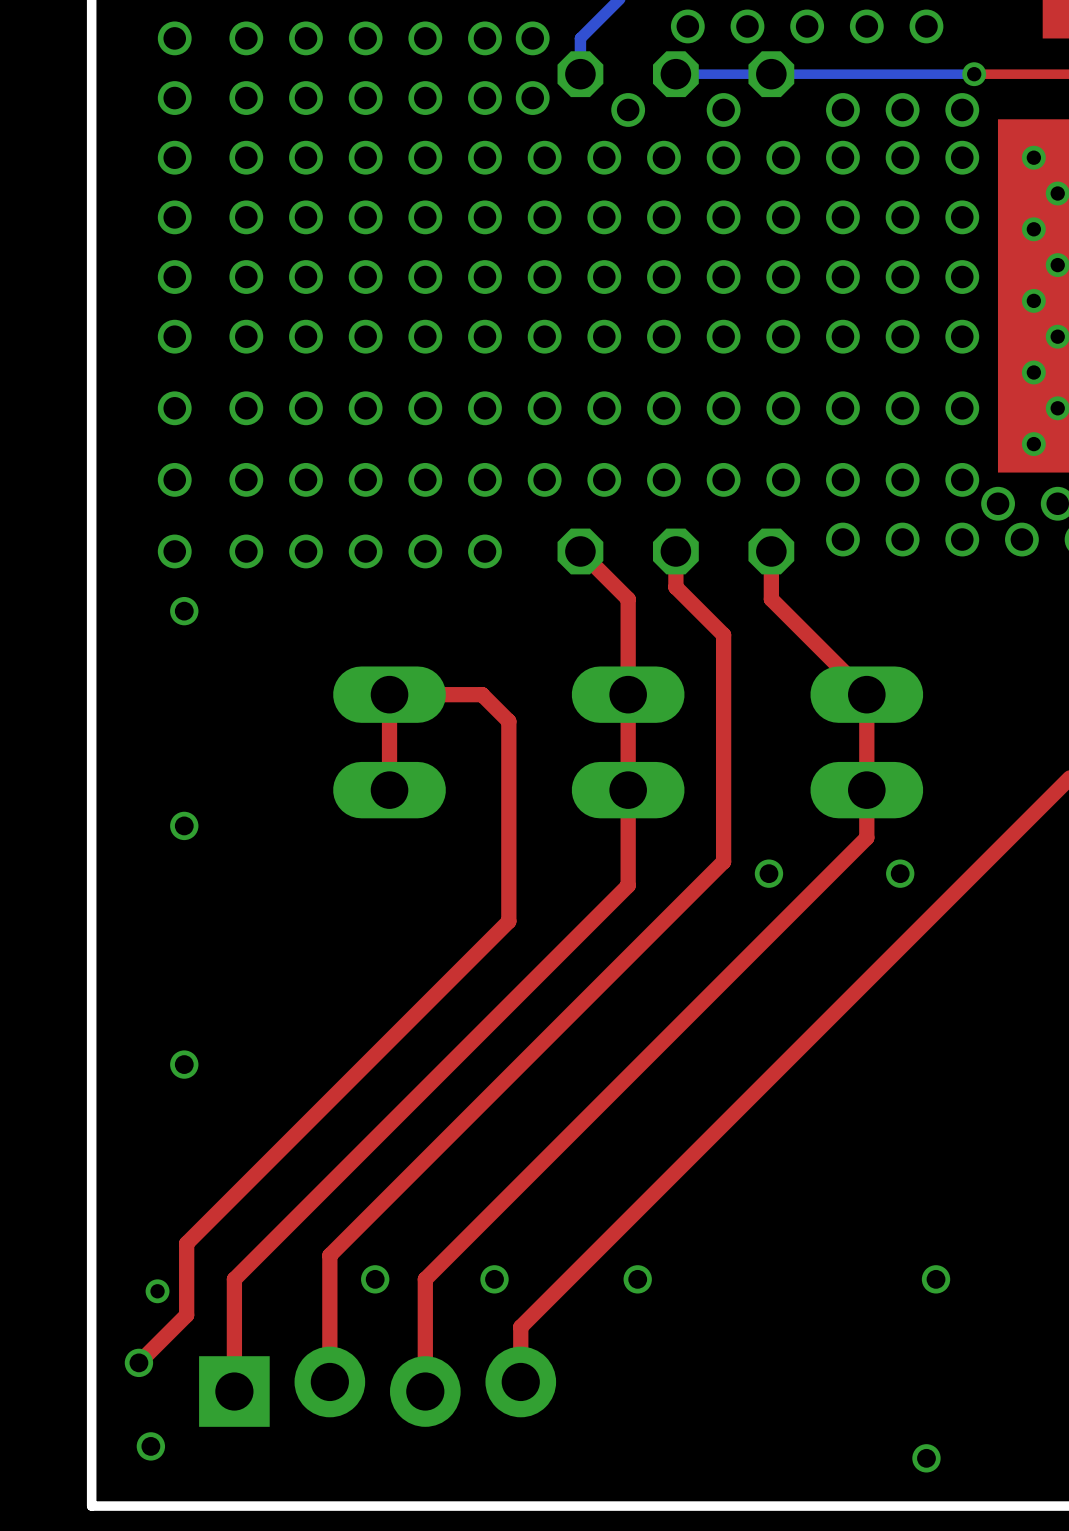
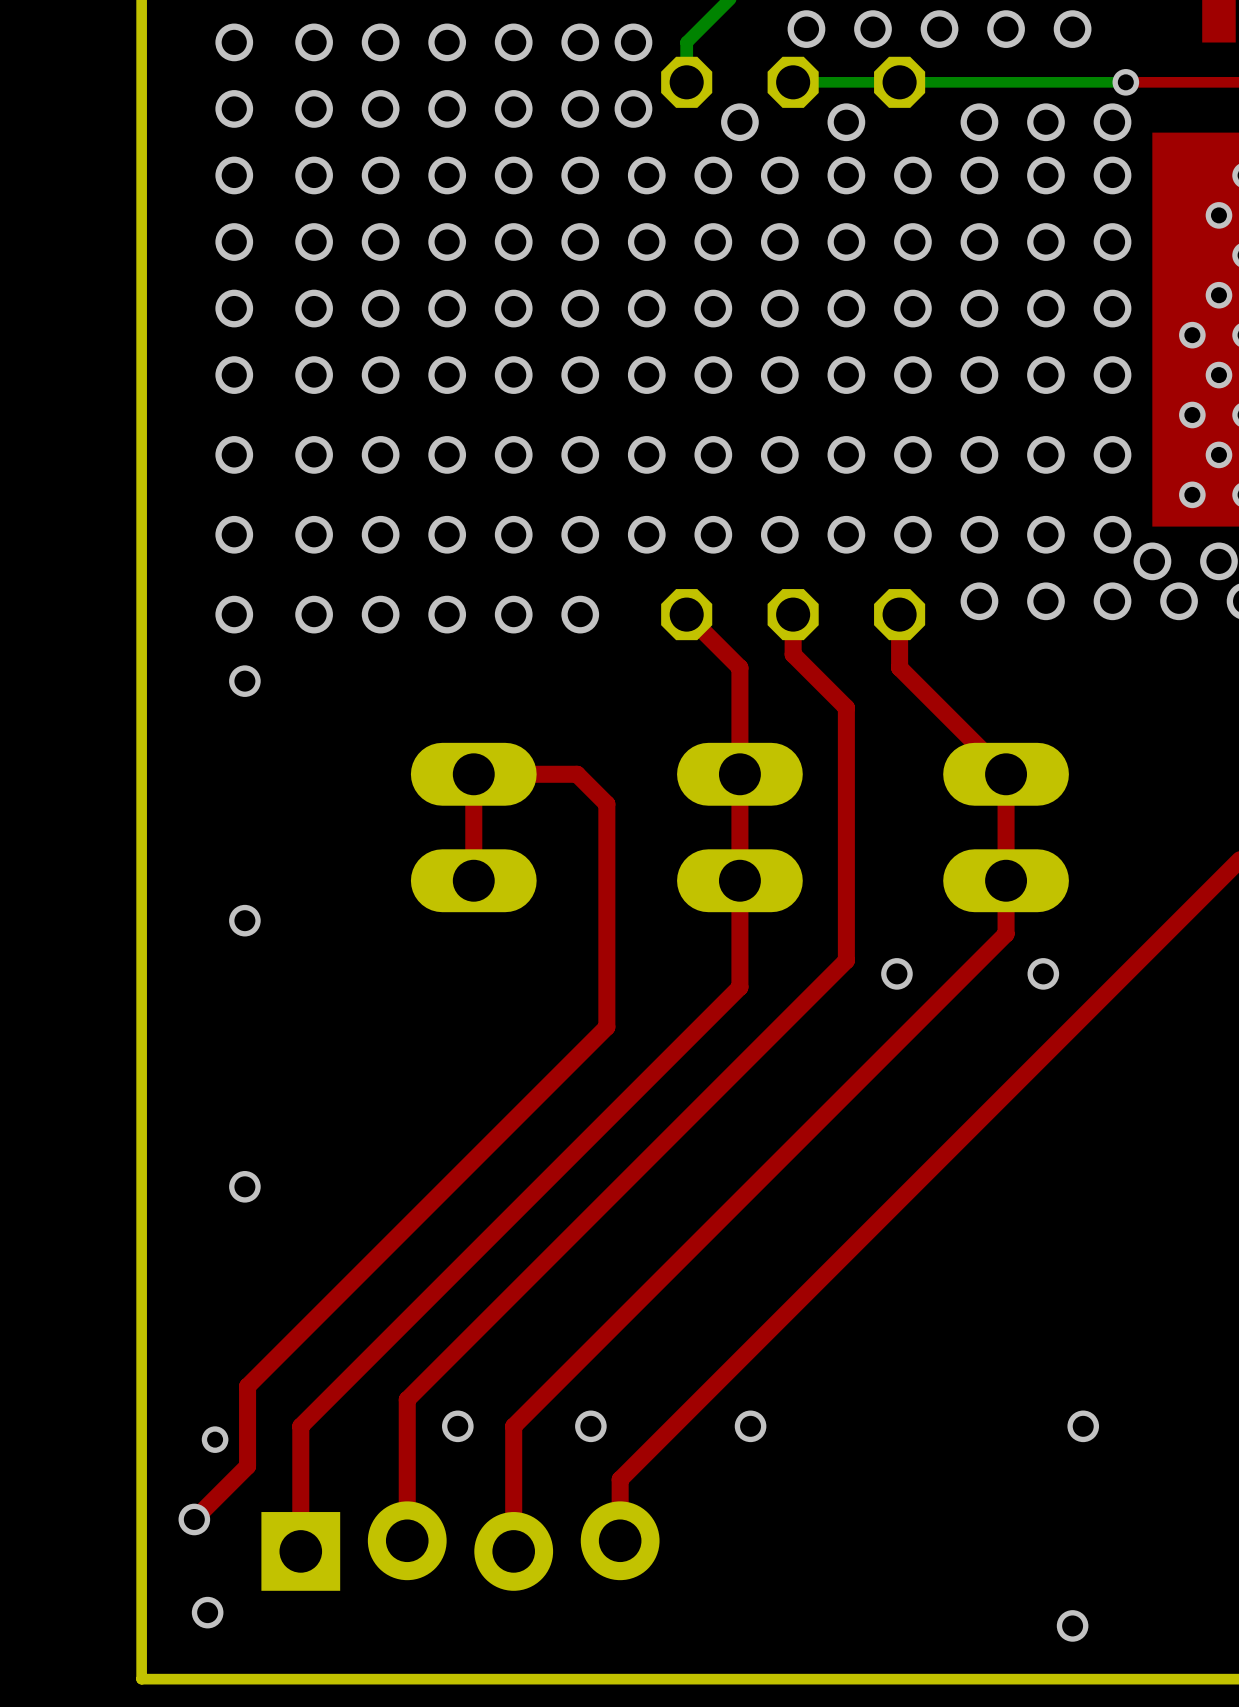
via: (1033, 157) -> none
via: (1033, 229) -> none

